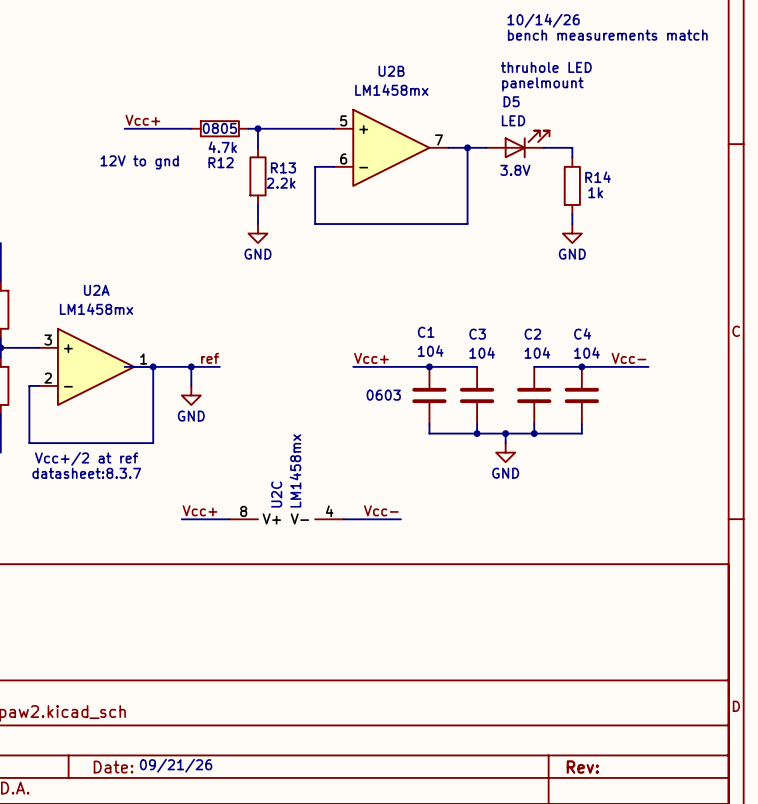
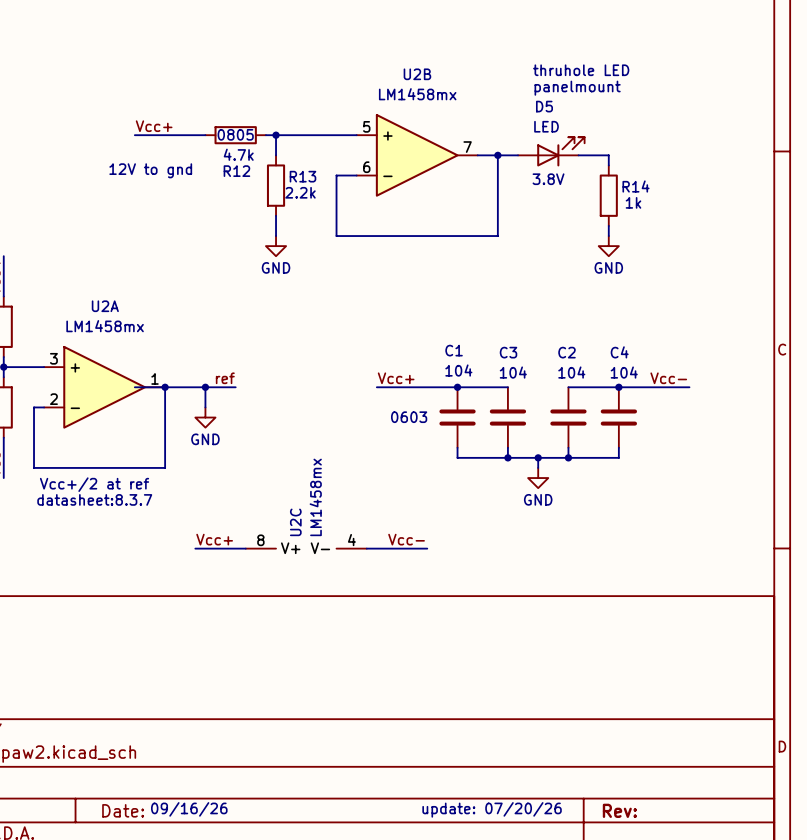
text: 10/14/26 (543, 20) -> none
text: bench measurements match (607, 35) -> none
text: 09/21/26 (176, 765) -> 09/16/26 (189, 809)
text: none -> update: 07/20/26 (492, 809)

